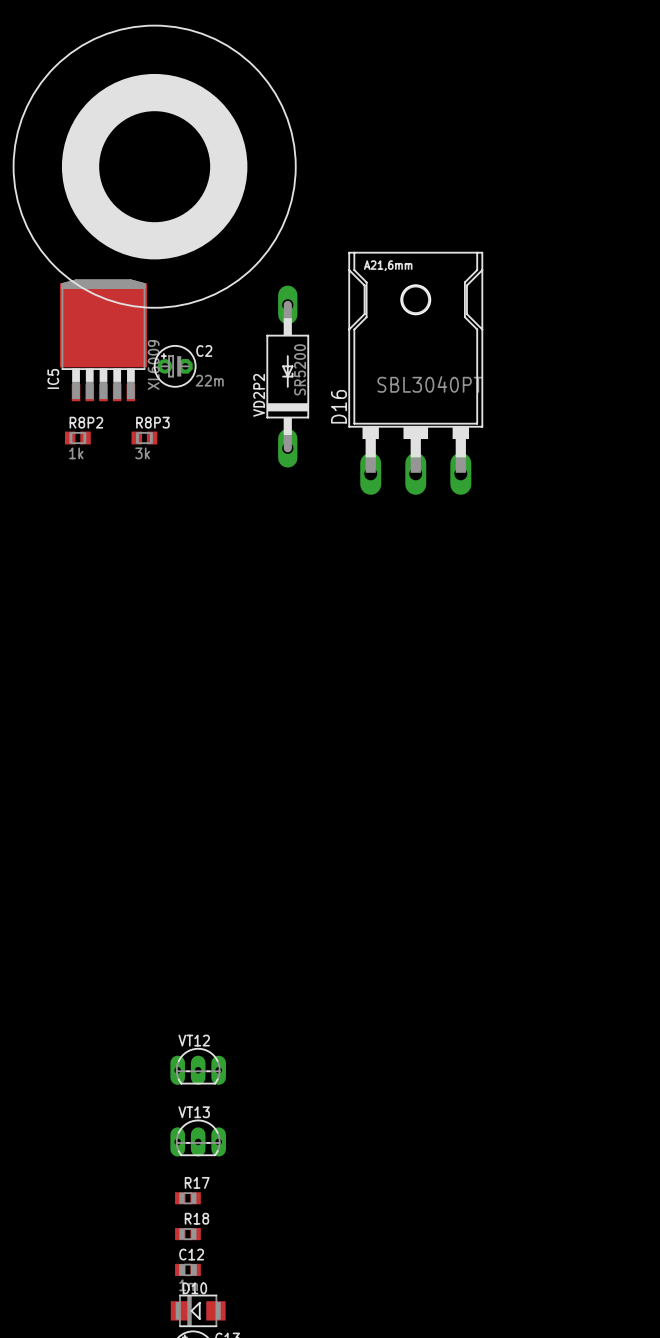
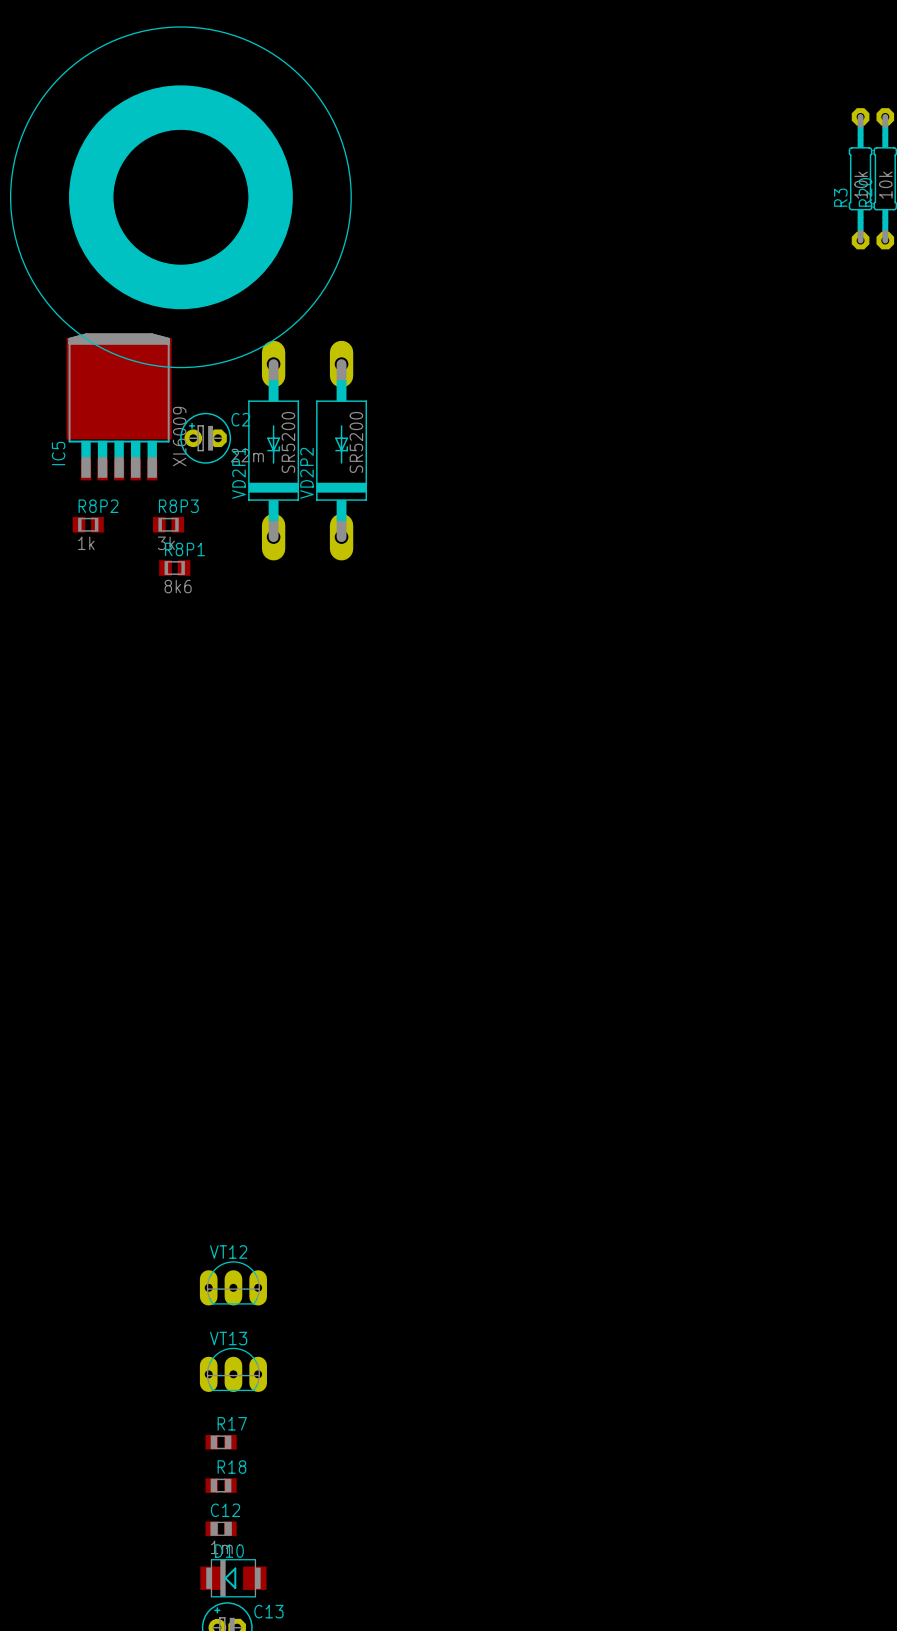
D16: SBL3040PT (415, 373) -> none
VD2P1: none -> SR5200 (273, 450)
R8P1: none -> 8k6 (174, 568)

